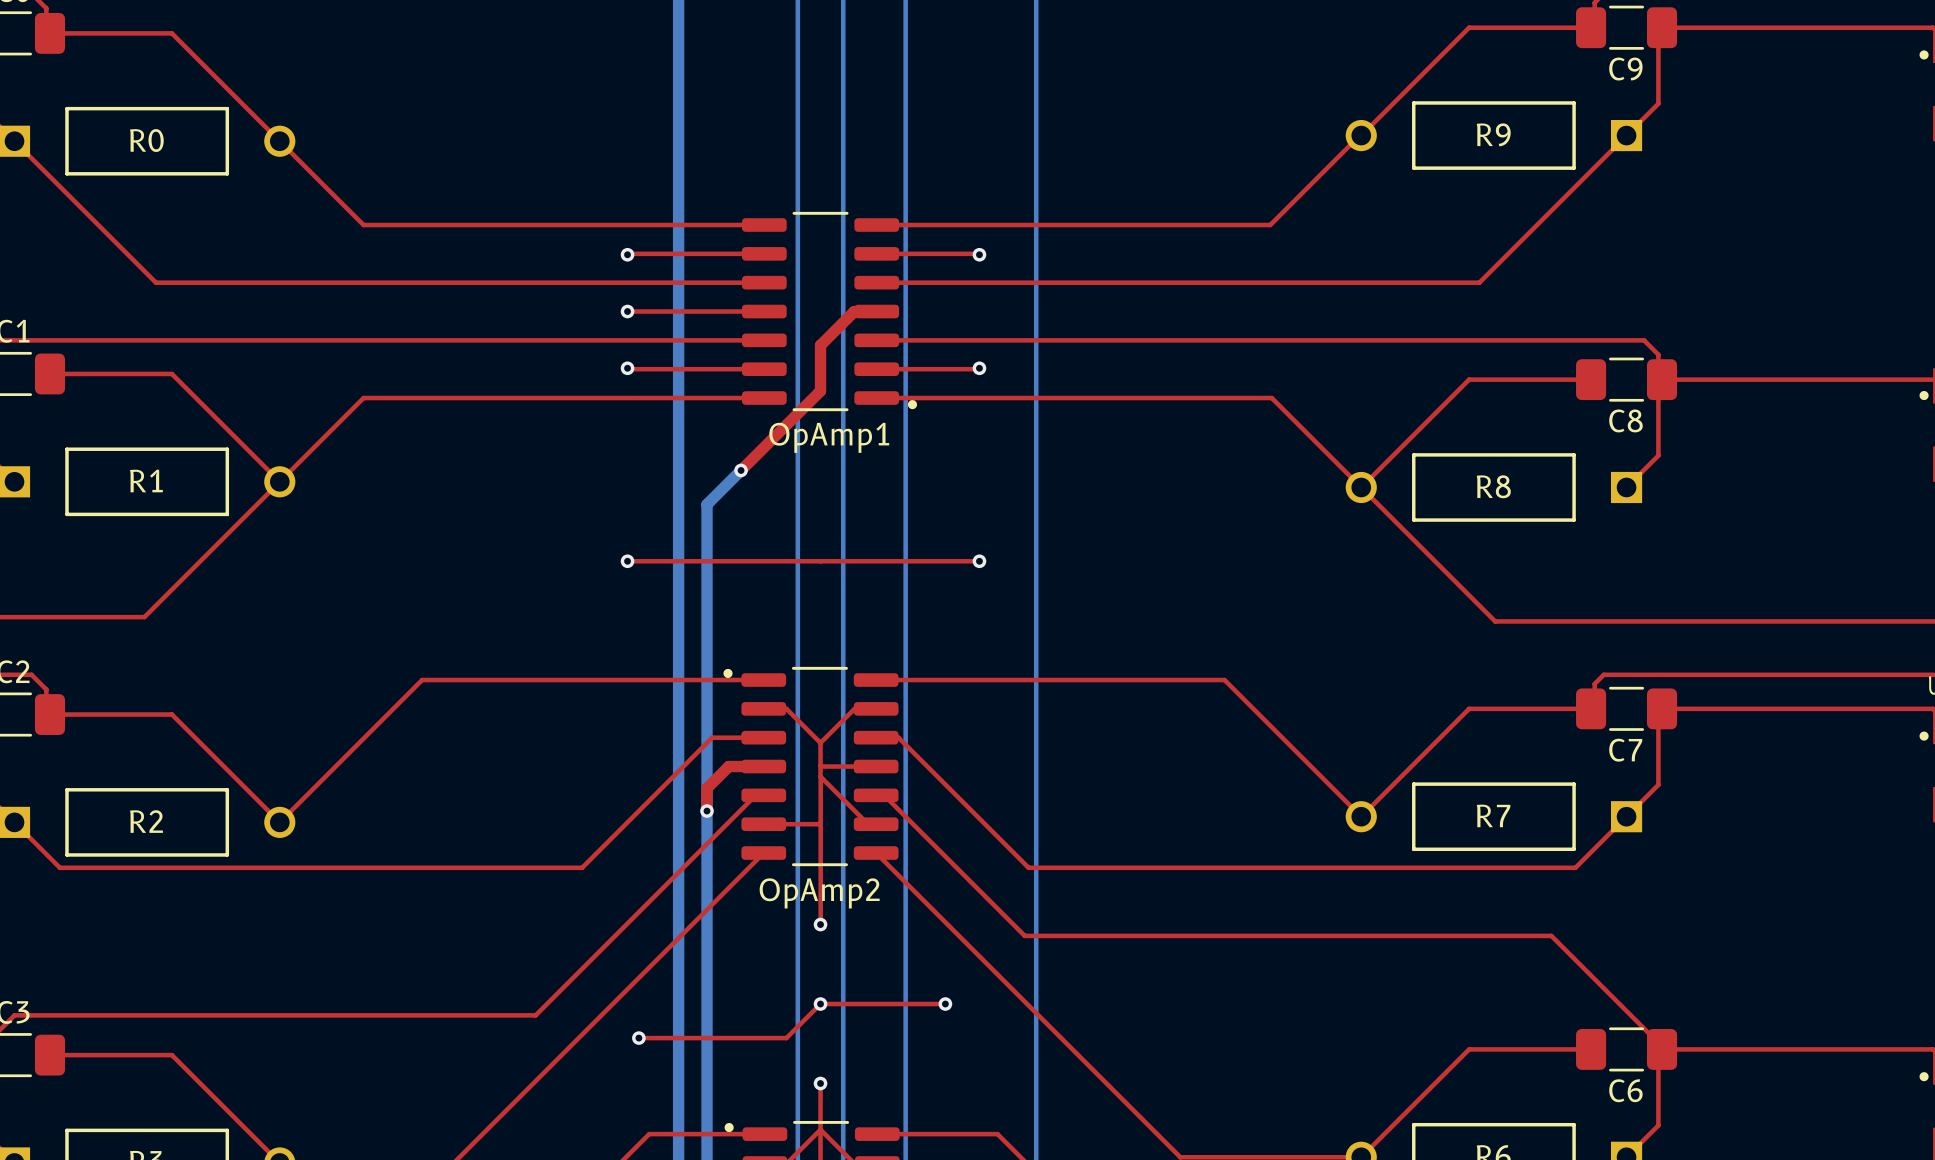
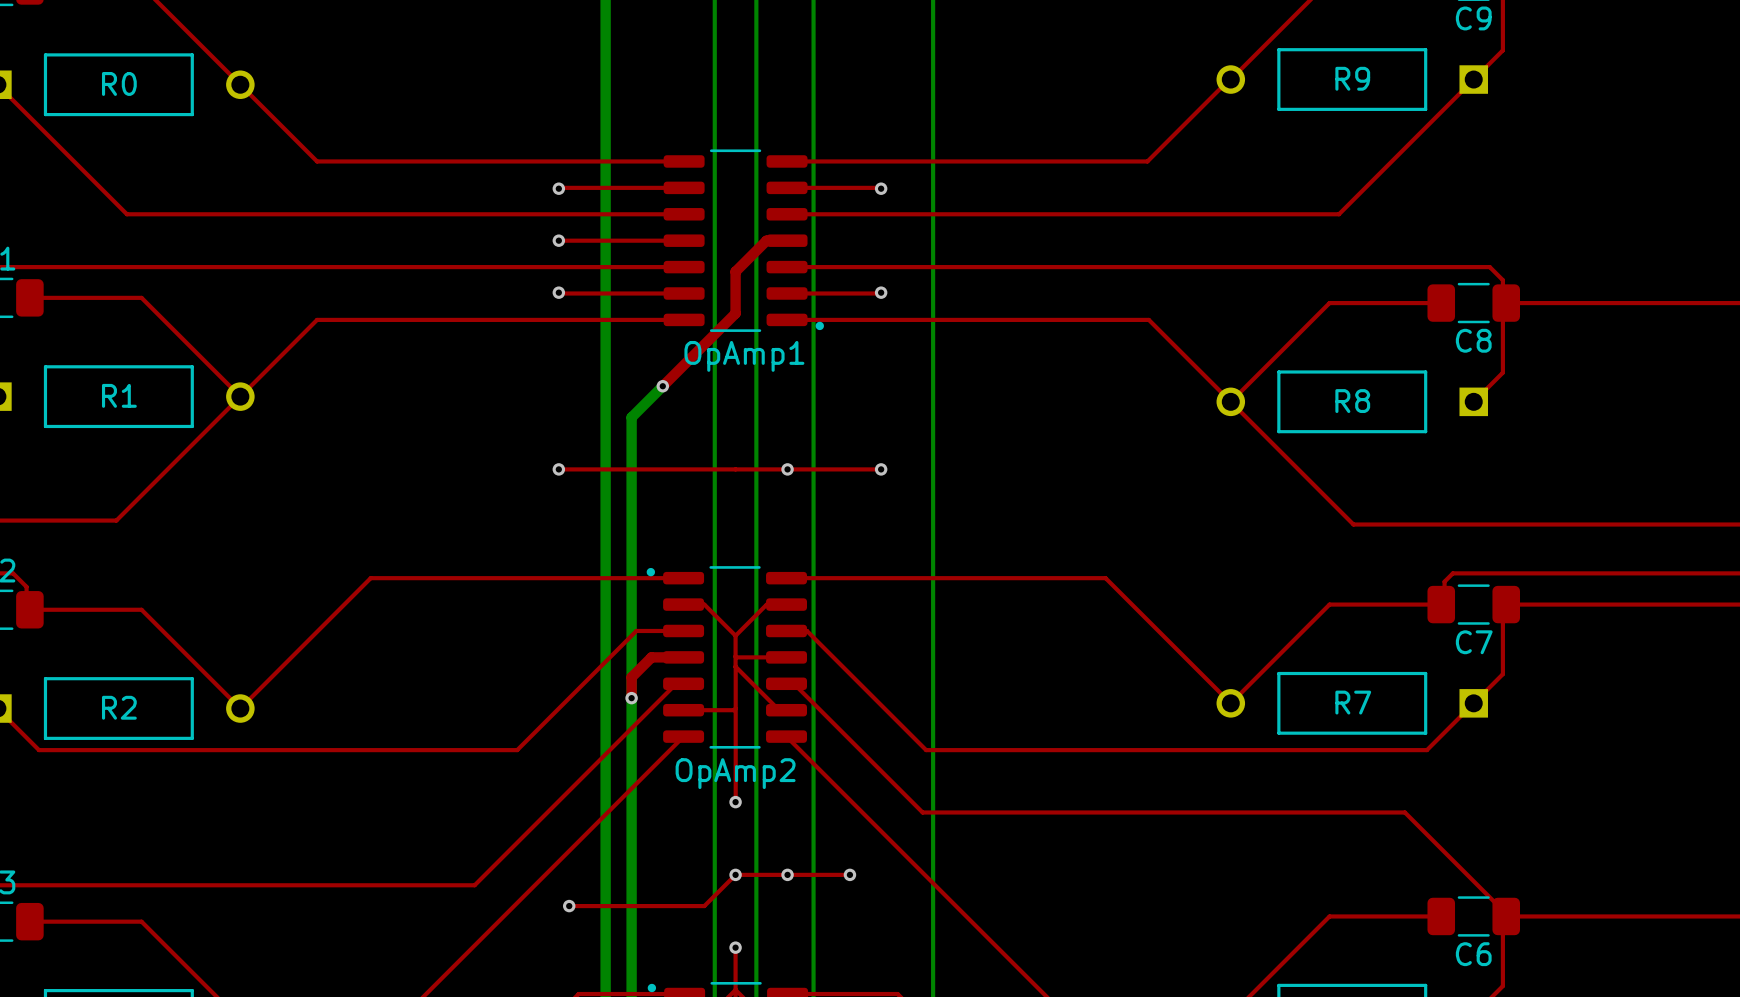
via: none -> (787, 469)
via: none -> (787, 874)

